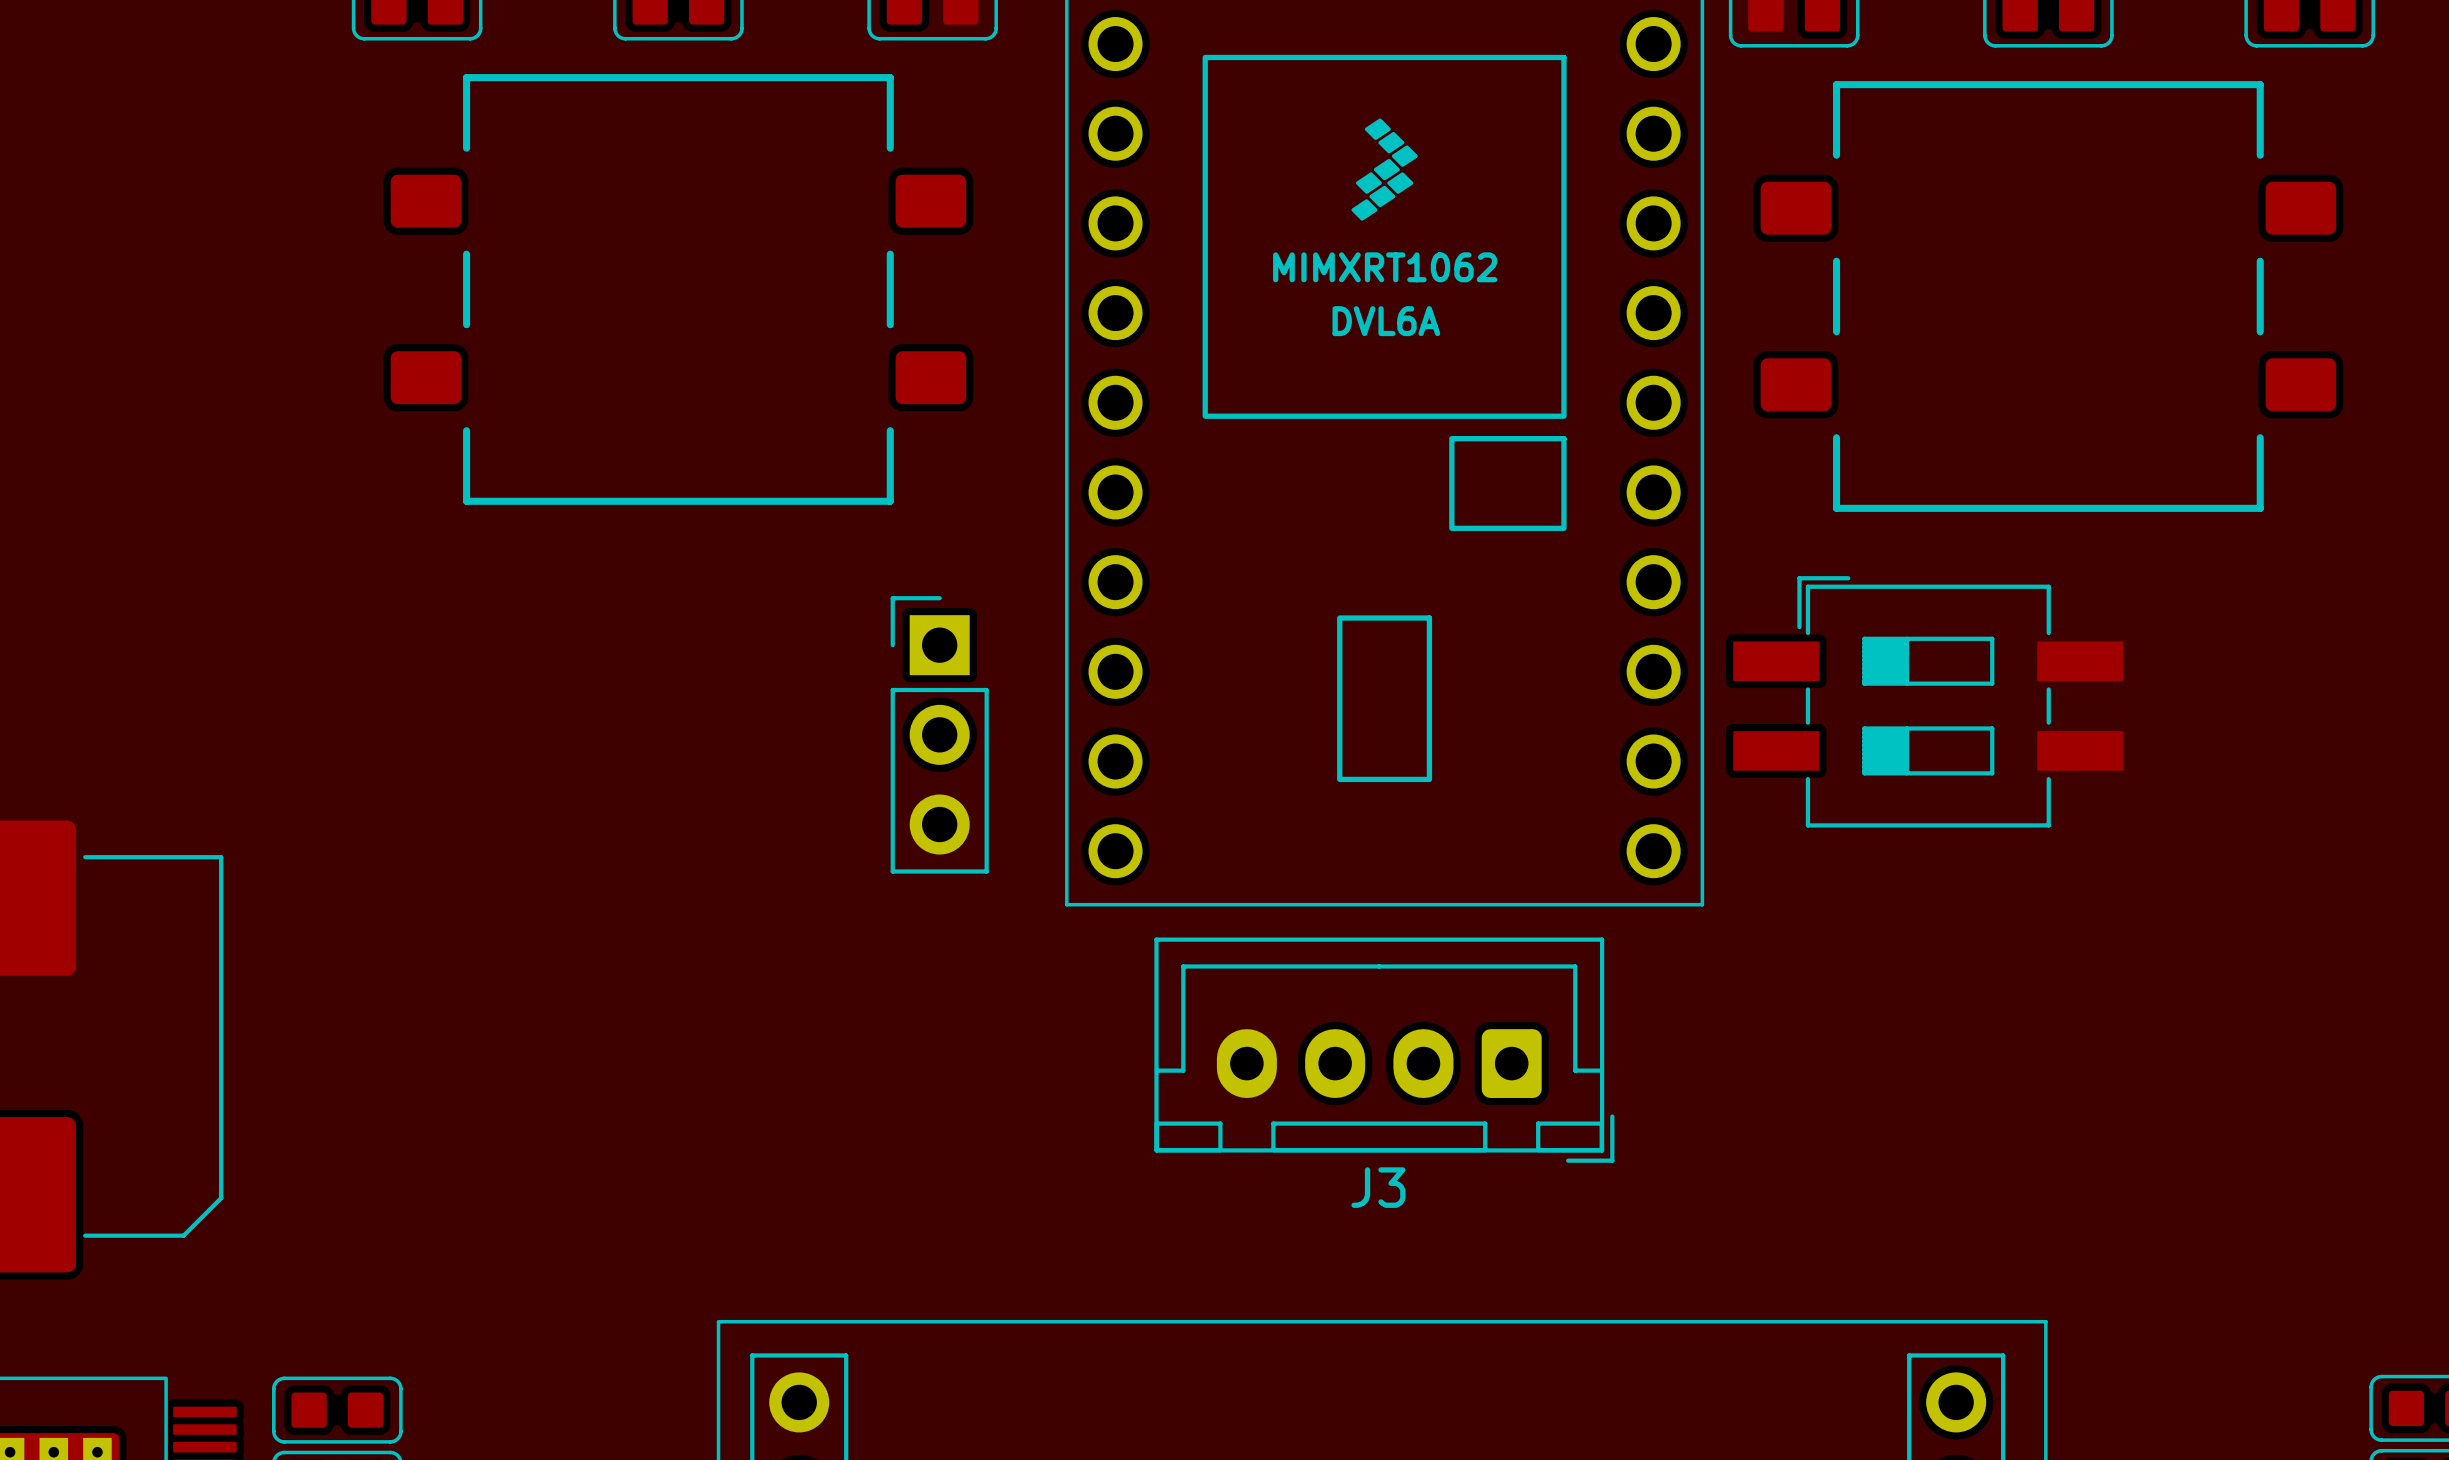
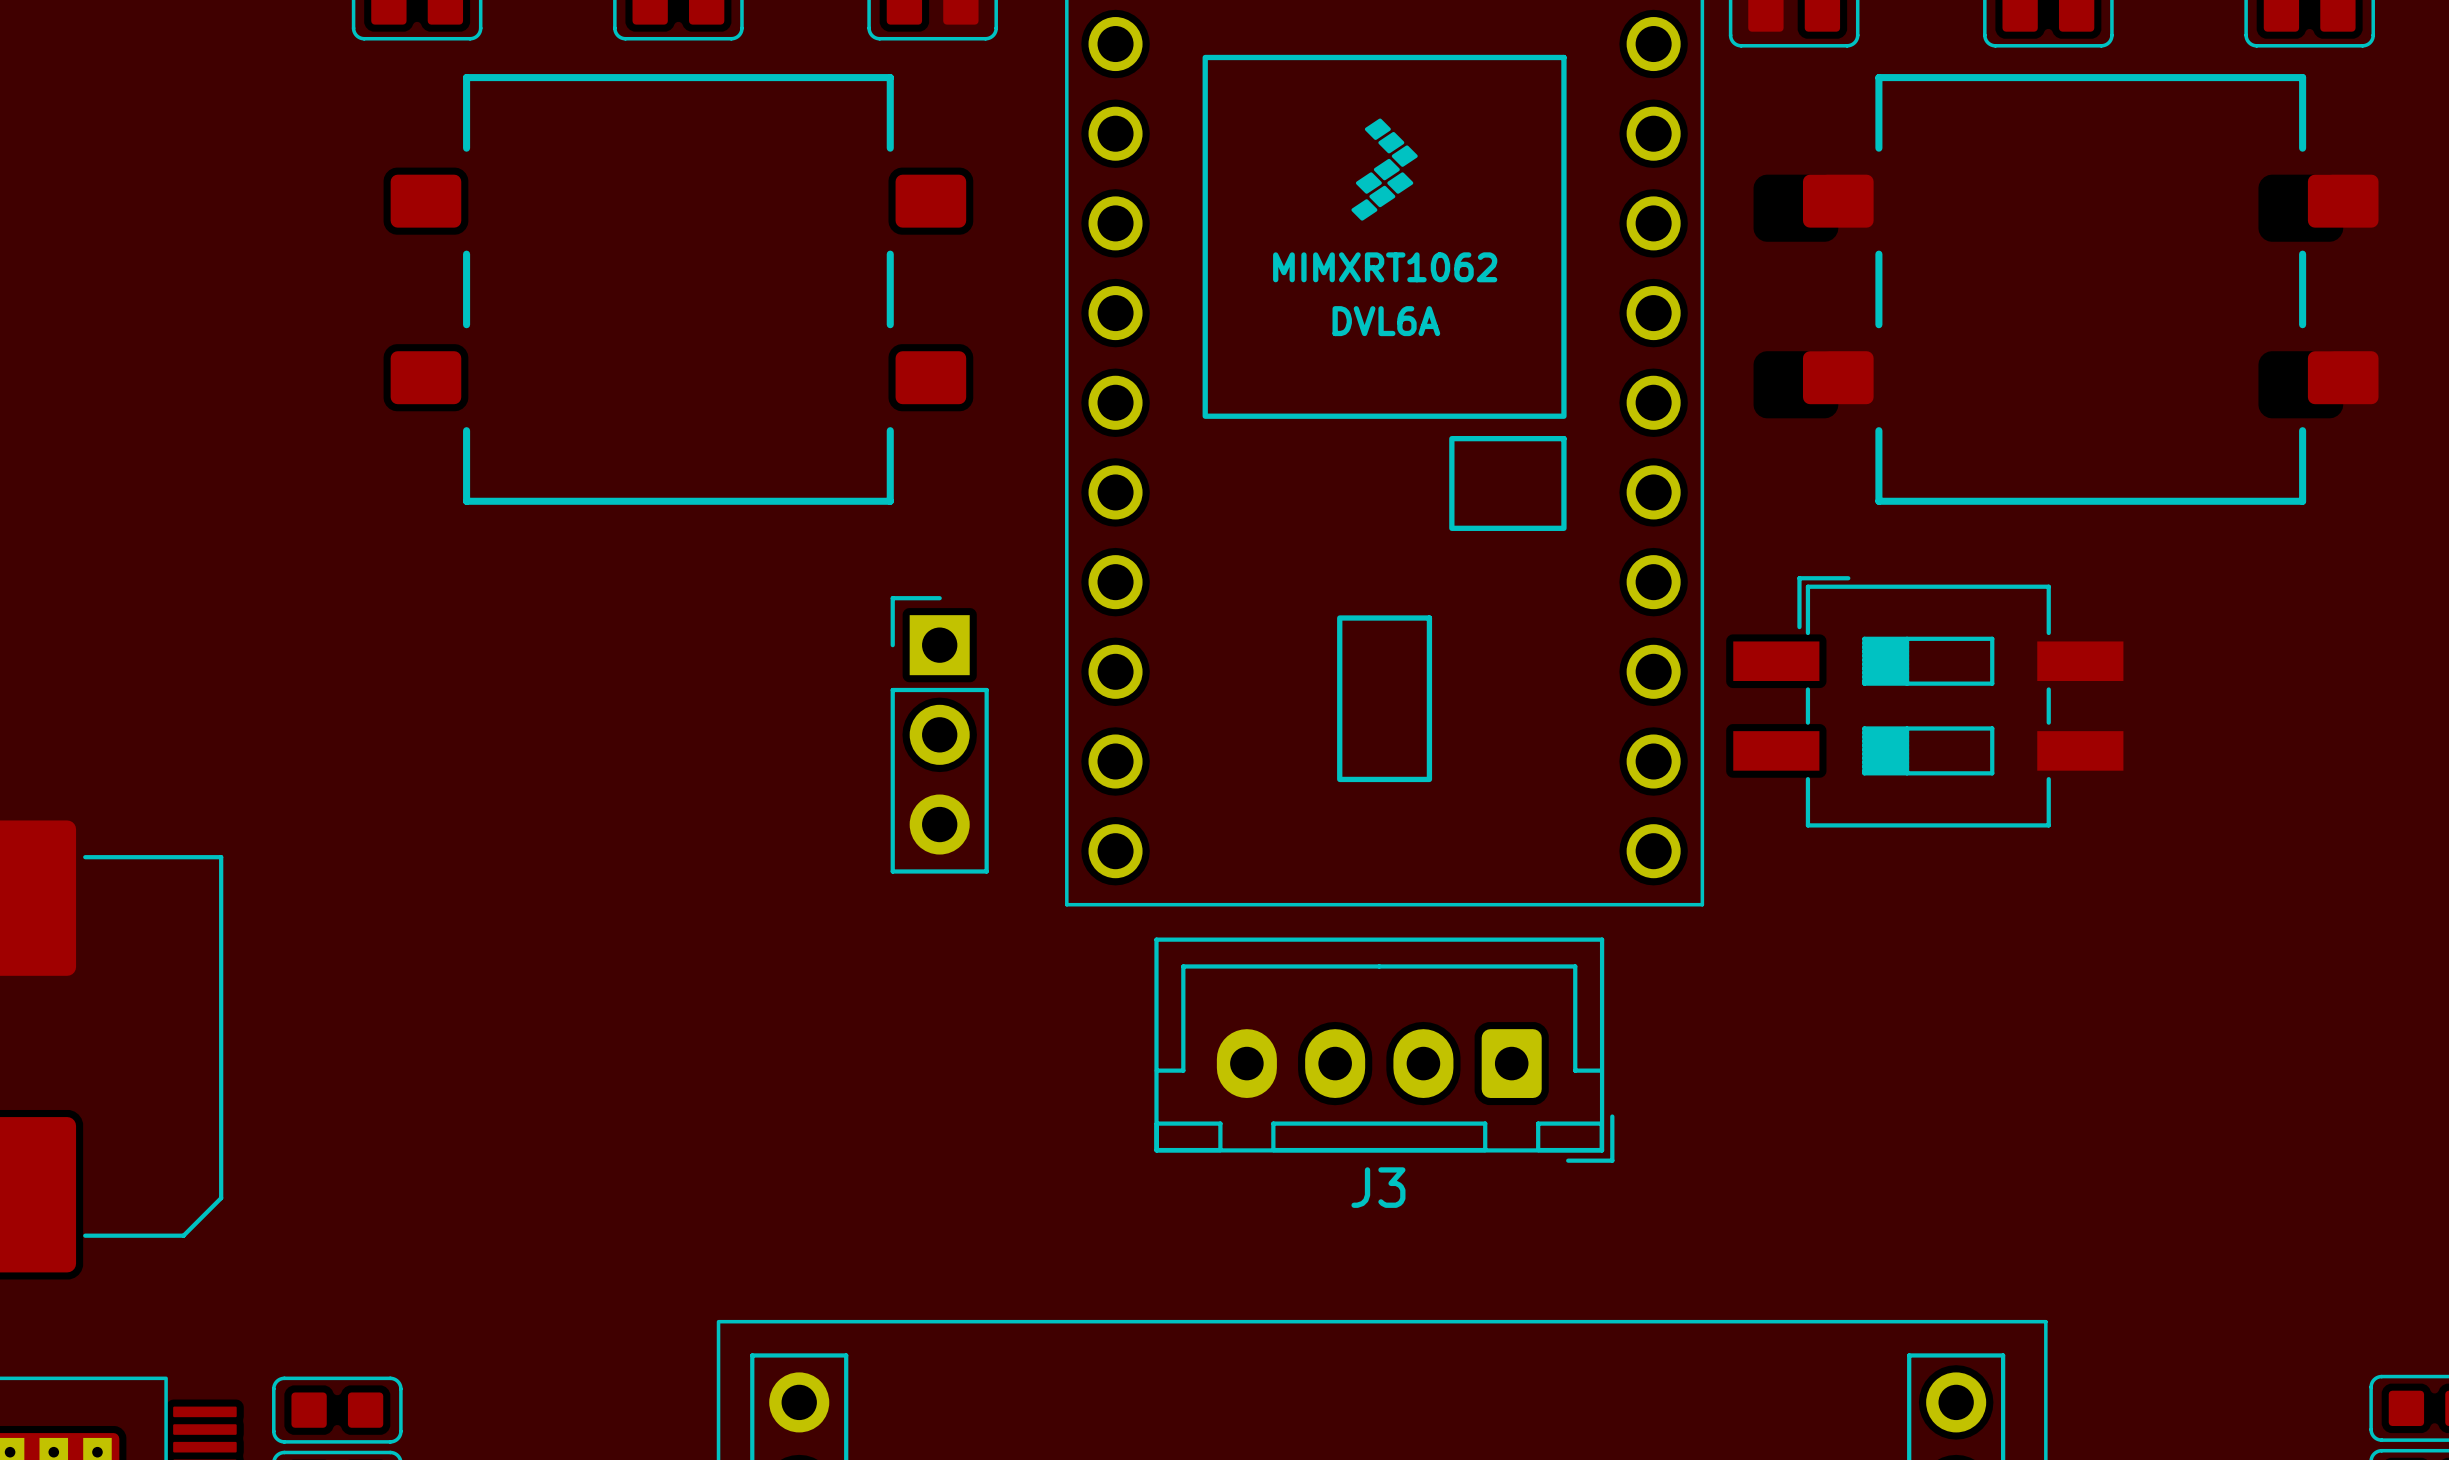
part position: (2048, 296) -> (2090, 289)

